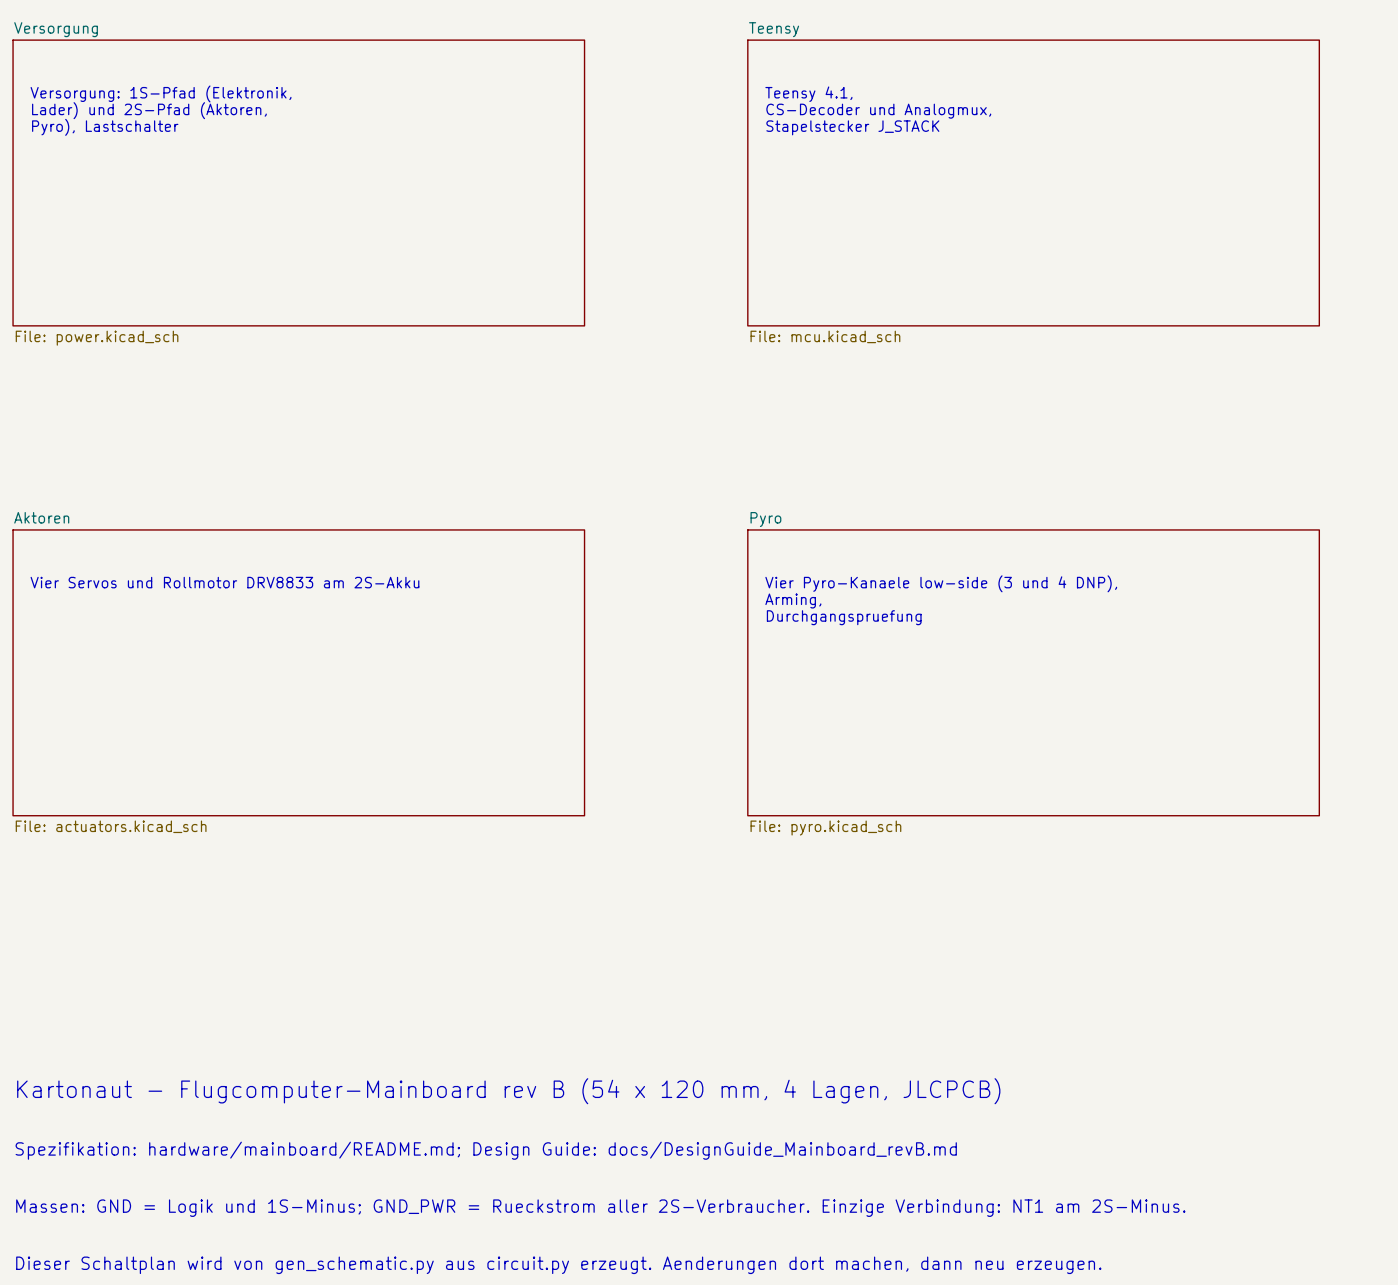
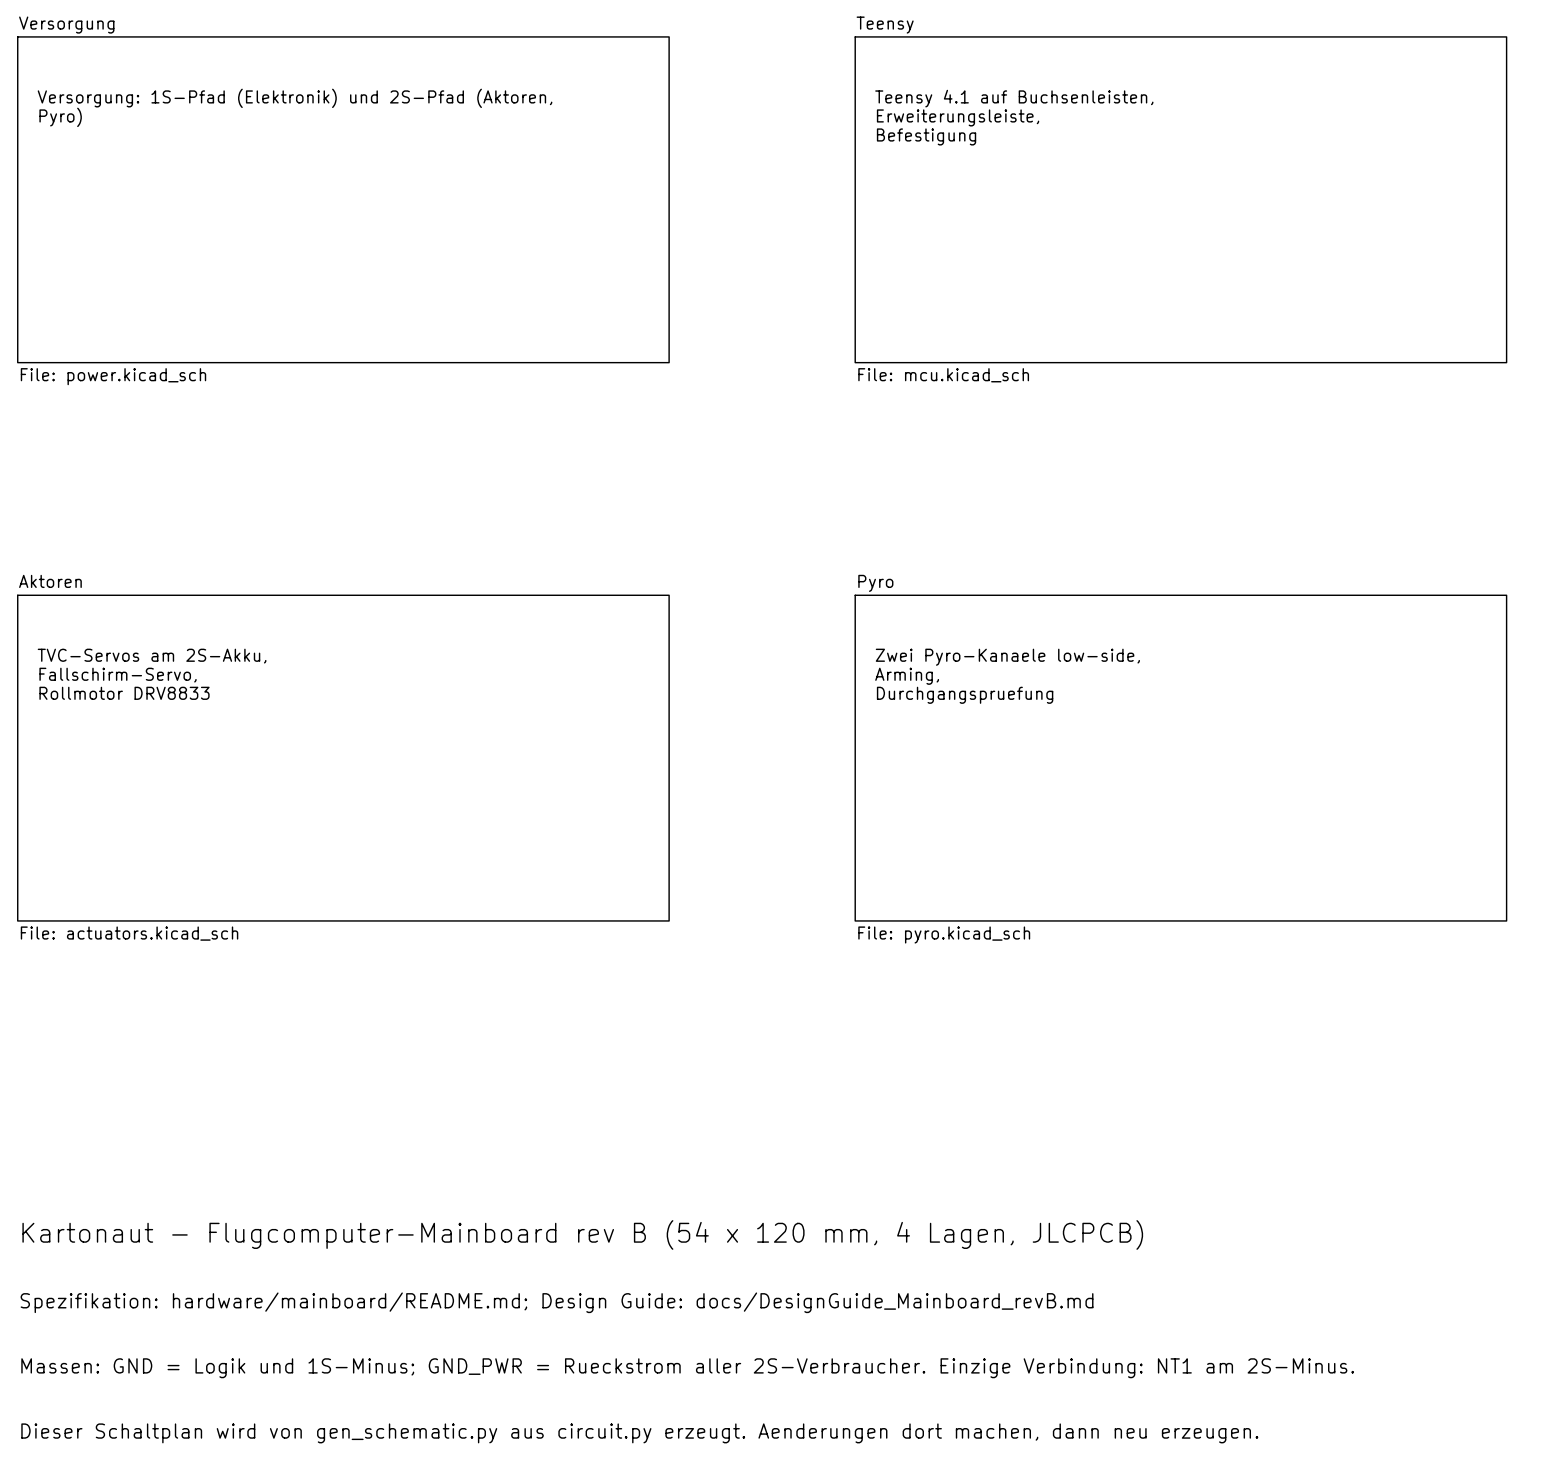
text: Versorgung: 1S-Pfad (Elektronik, (161, 93) -> Versorgung: 1S-Pfad (Elektronik) und 2S-Pfad (Aktoren, (295, 98)
text: Teensy 4.1, (808, 94) -> Teensy 4.1 auf Buchsenleisten, (1014, 98)
text: Lader) und 2S-Pfad (Aktoren, (149, 110) -> Pyro) (60, 117)
text: CS-Decoder und Analogmux, (878, 111) -> Erweiterungsleiste, (958, 117)
text: Pyro), Lastschalter (105, 127) -> none
text: Stapelstecker J_STACK (852, 127) -> Befestigung (926, 136)
text: Vier Servos und Rollmotor DRV8833 am 2S-Akku (224, 582) -> TVC-Servos am 2S-Akku, (152, 656)
text: Vier Pyro-Kanaele low-side (3 und 4 DNP), (941, 583) -> Zwei Pyro-Kanaele low-side, (1007, 657)
text: none -> Fallschirm-Servo, (118, 675)
text: none -> Rollmotor DRV8833 (124, 693)

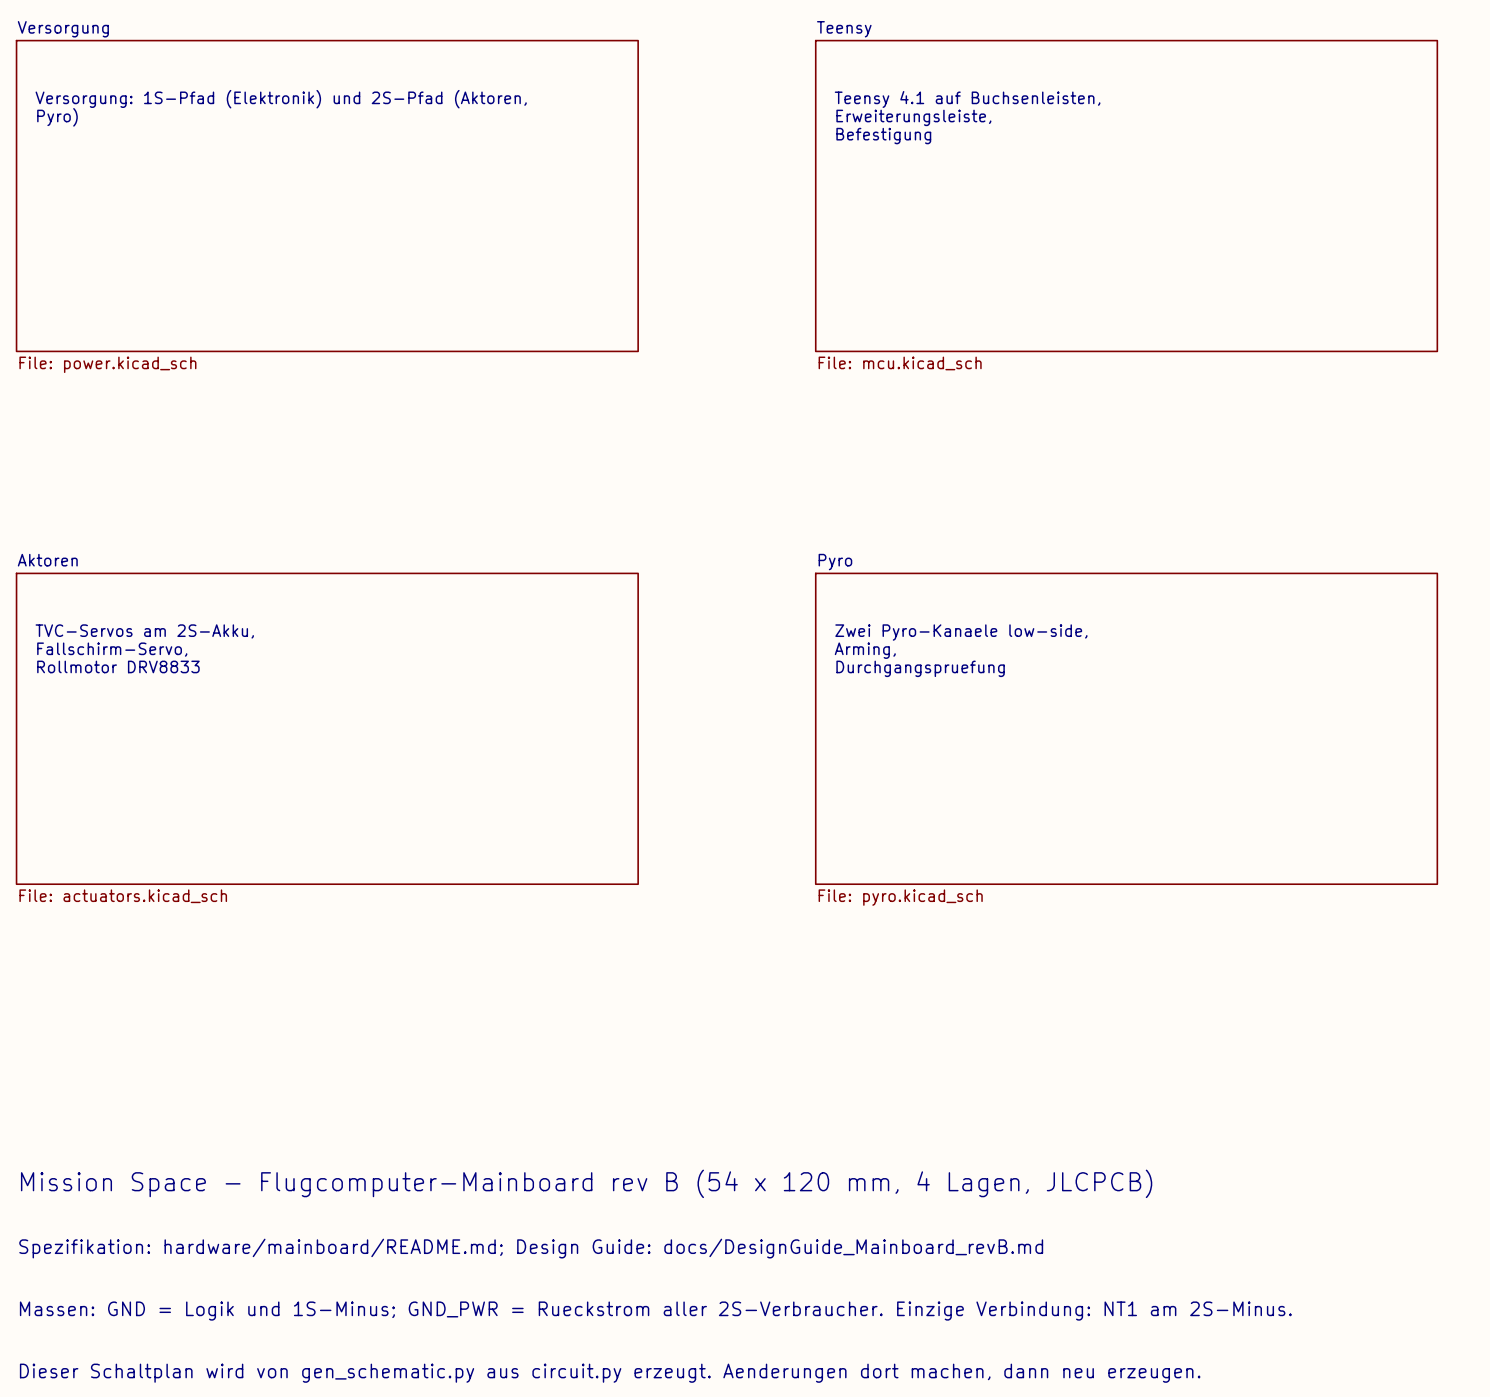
text: Kartonaut - Flugcomputer-Mainboard rev B (54 x 120 mm, 4 Lagen, JLCPCB) (582, 1234) -> Mission Space - Flugcomputer-Mainboard rev B (54 x 120 mm, 4 Lagen, JLCPCB) (586, 1183)

